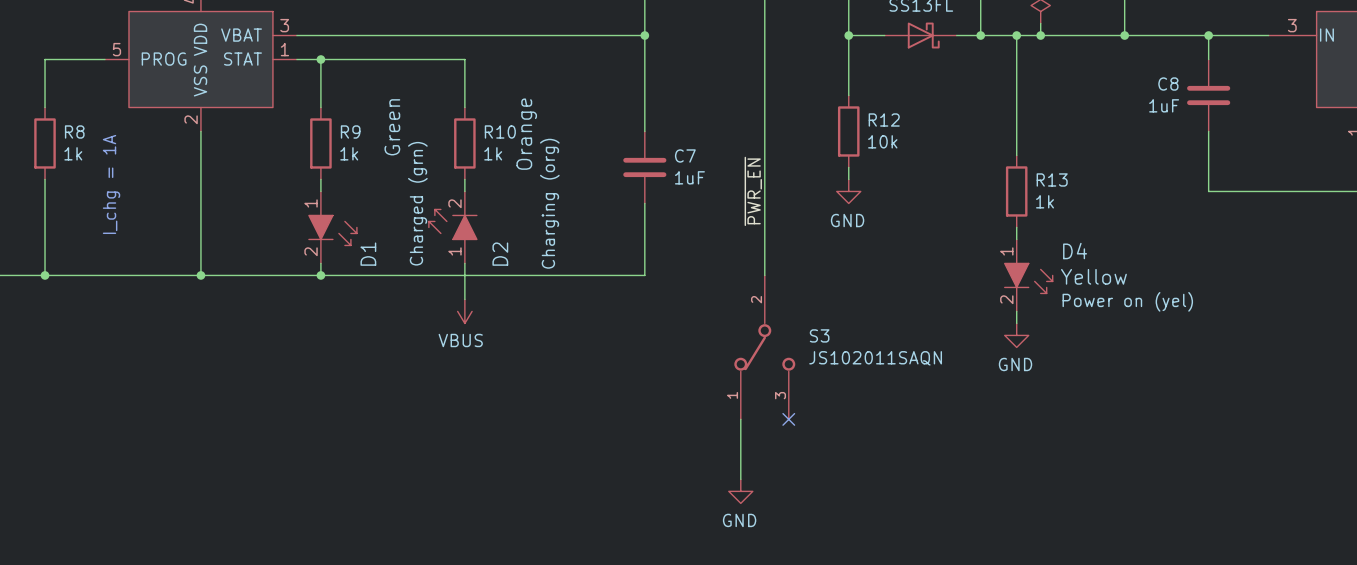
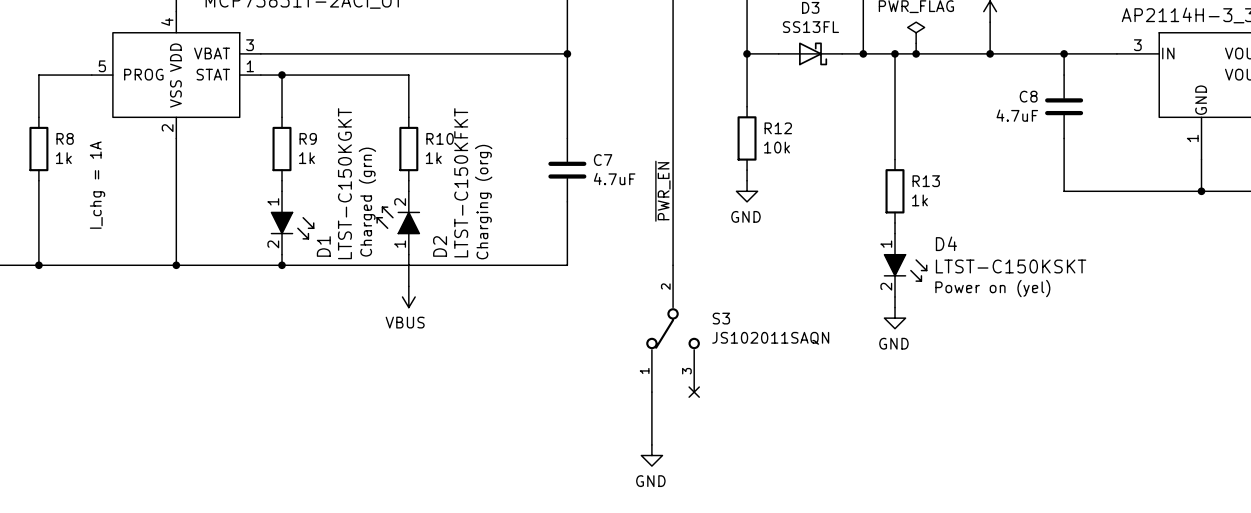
C8 value: 1uF (1164, 105) -> 4.7uF (1017, 115)
D1 value: Green (392, 127) -> LTST-C150KGKT (344, 183)
D2 value: Orange (526, 134) -> LTST-C150KFKT (461, 182)
C7 value: 1uF (689, 177) -> 4.7uF (614, 179)
D4 value: Yellow (1093, 276) -> LTST-C150KSKT (1011, 266)

